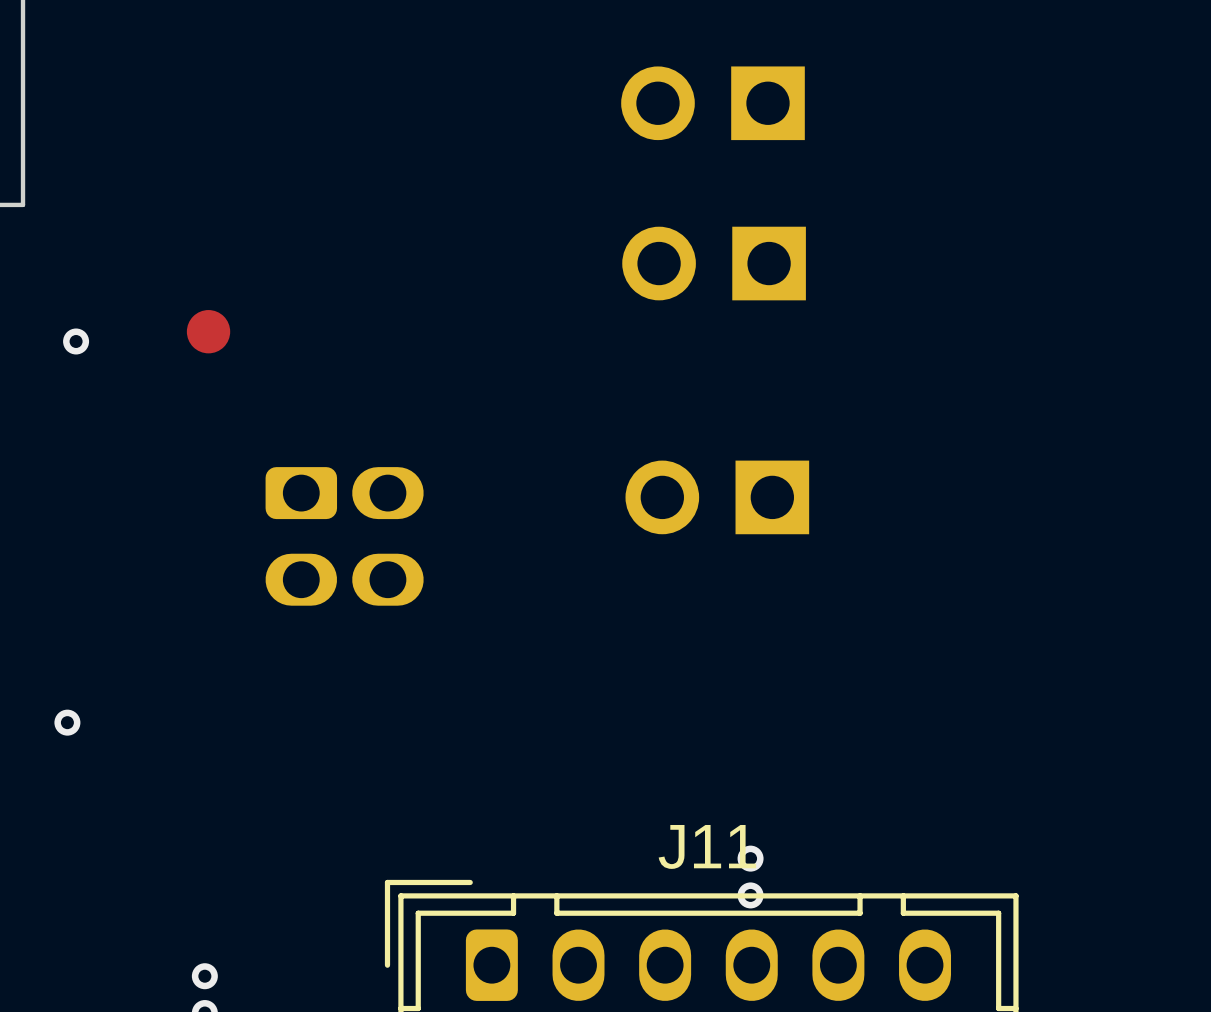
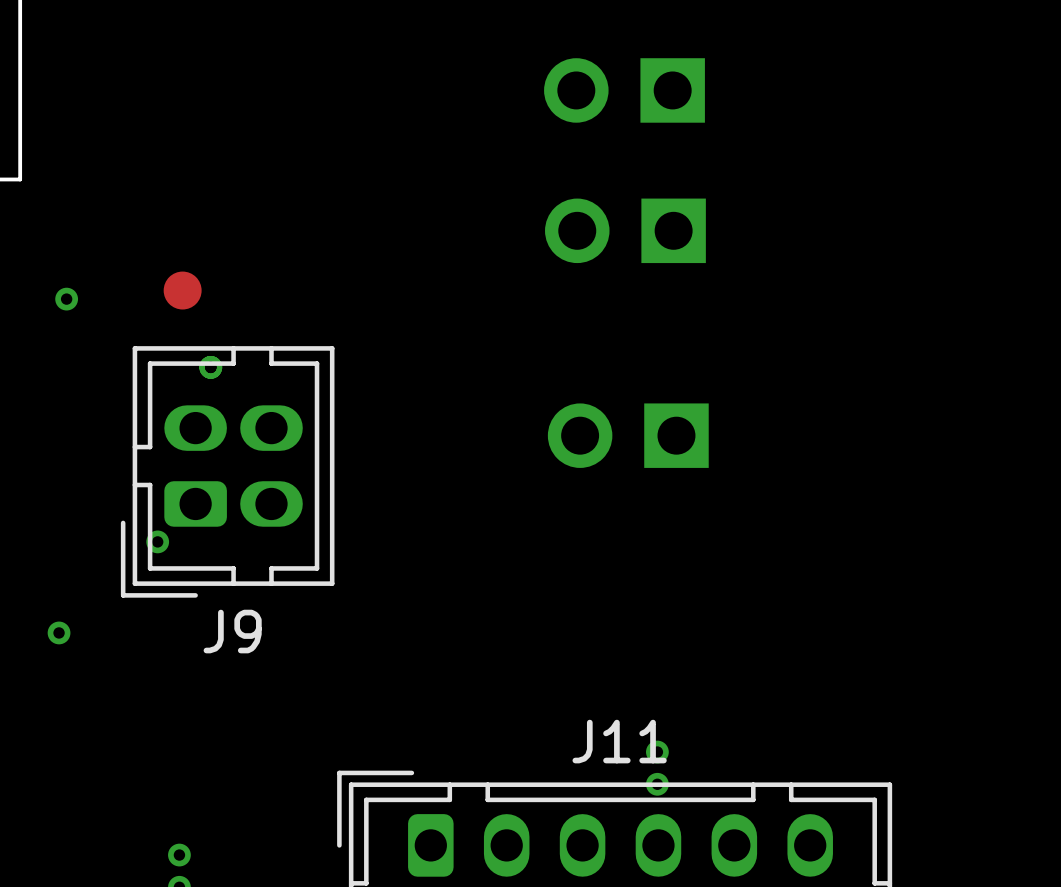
via: none -> (210, 367)
J9 side: bottom (344, 536) -> top (227, 471)
via: none -> (157, 541)

